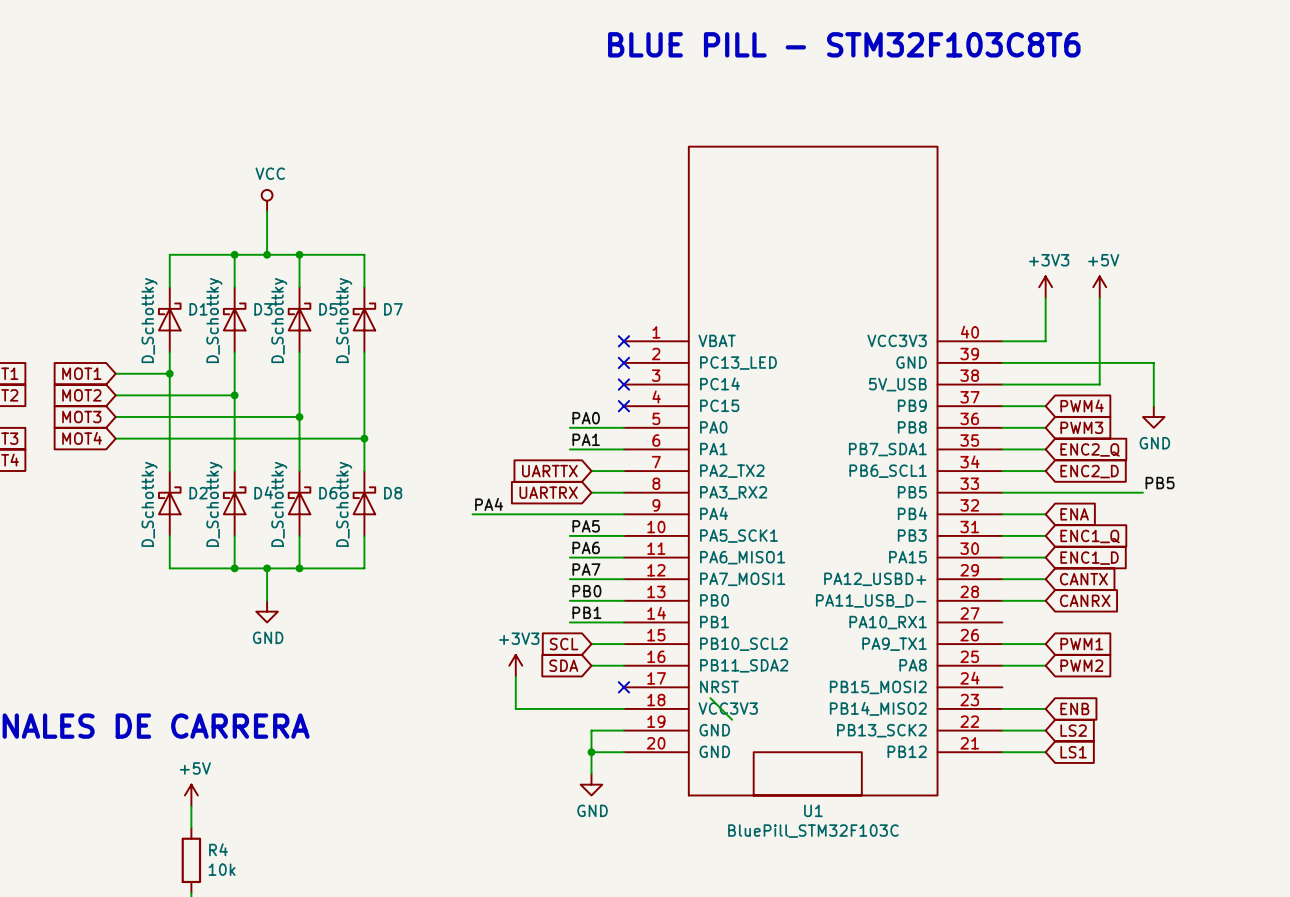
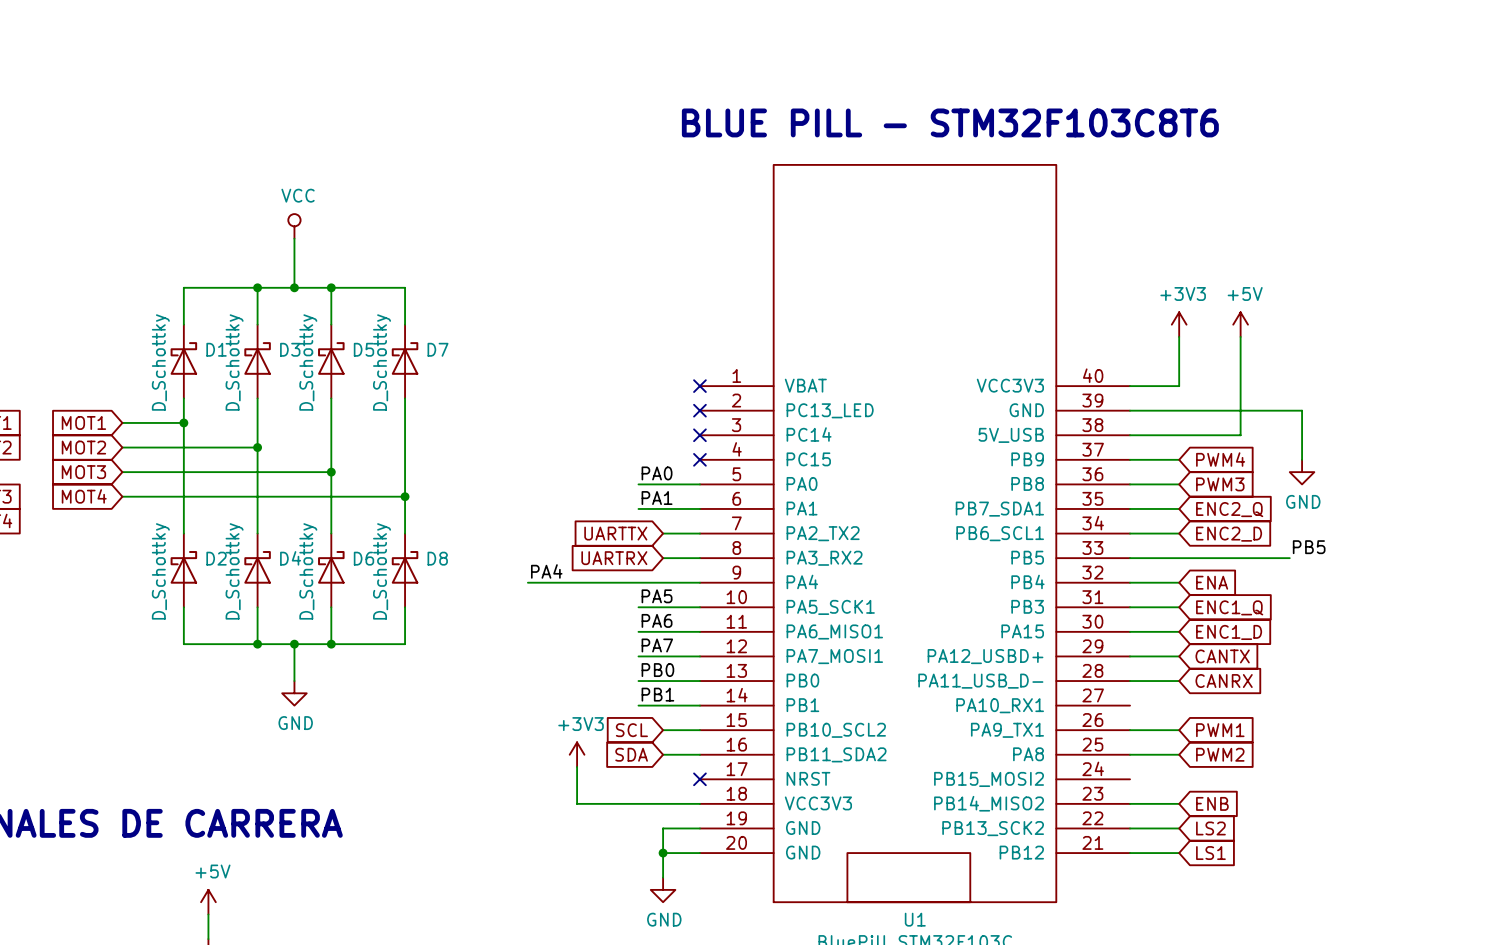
text position: BLUE PILL - STM32F103C8T6 (844, 44) -> BLUE PILL - STM32F103C8T6 (950, 122)
wire: (710, 698) (732, 719) -> none

